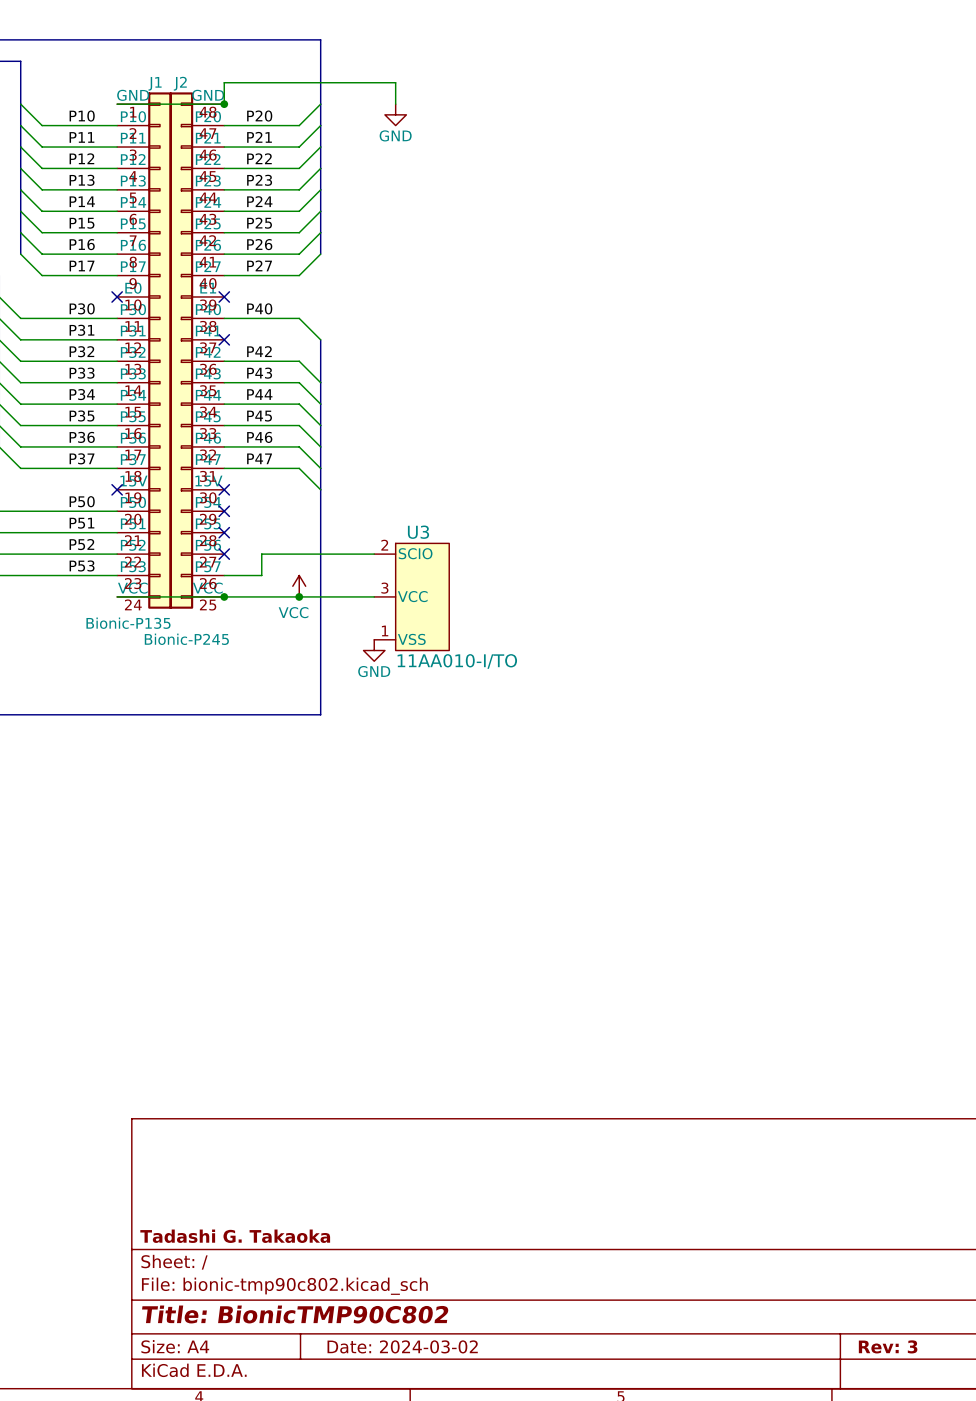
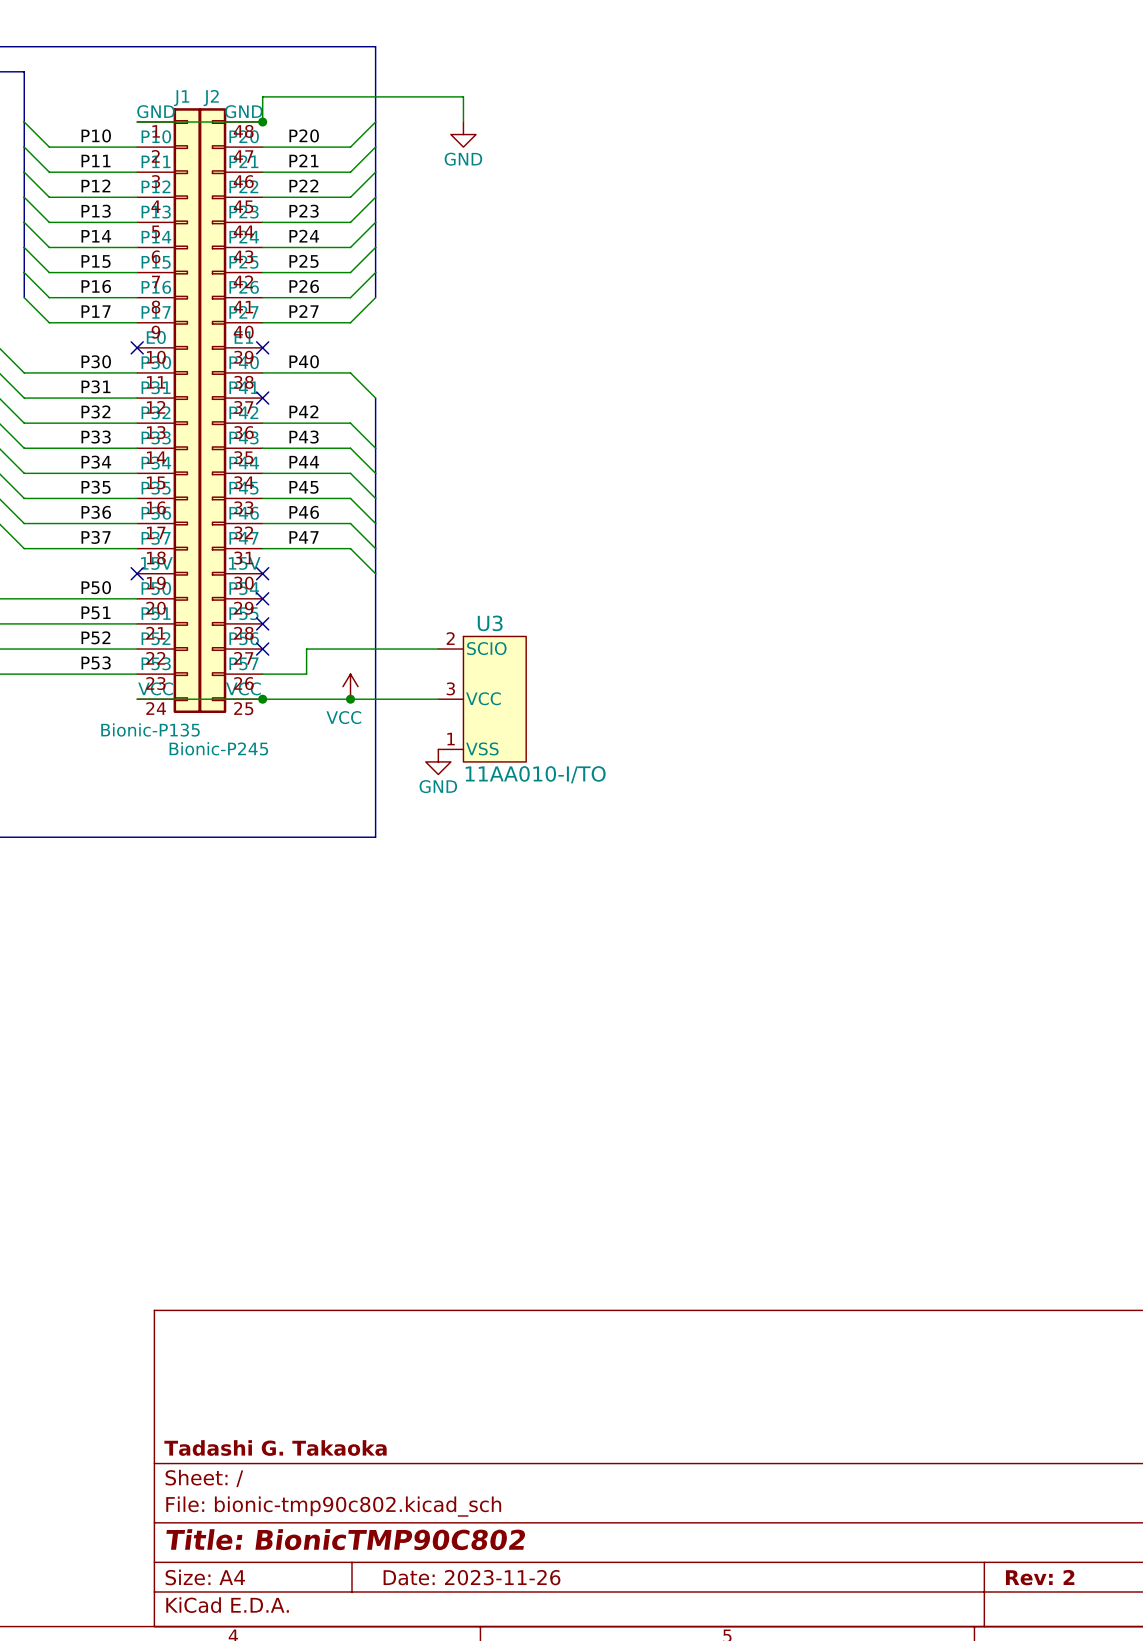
title block: Date: 2024-03-02 (402, 1346) -> Date: 2023-11-26 (472, 1577)
title block: Rev: 3 (888, 1346) -> Rev: 2 (1040, 1577)

